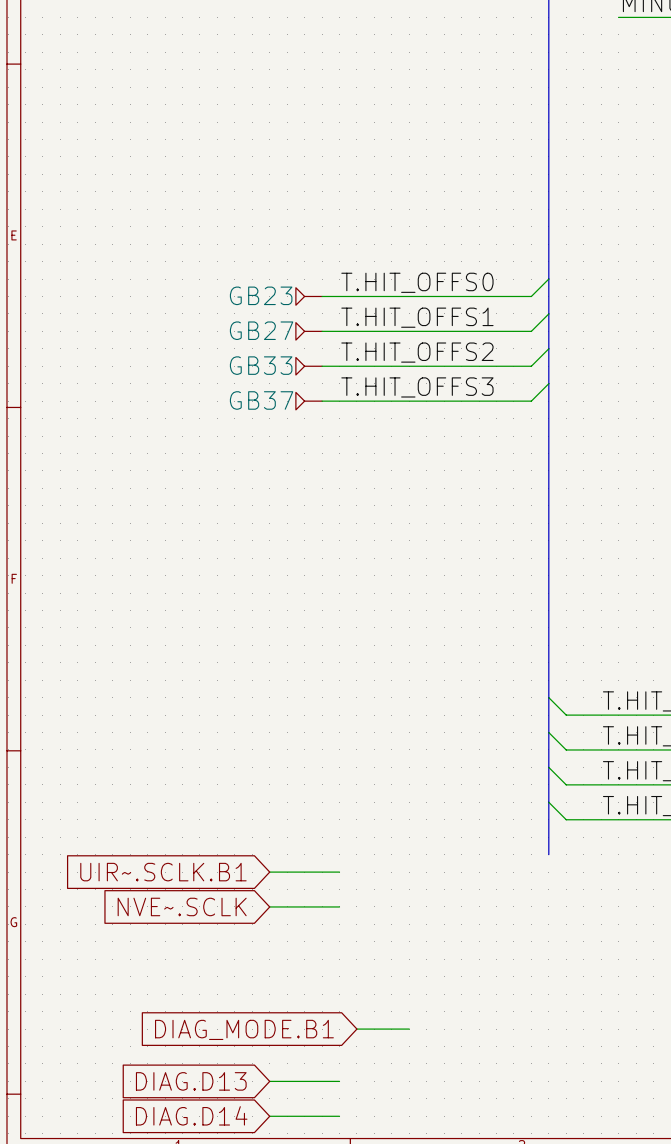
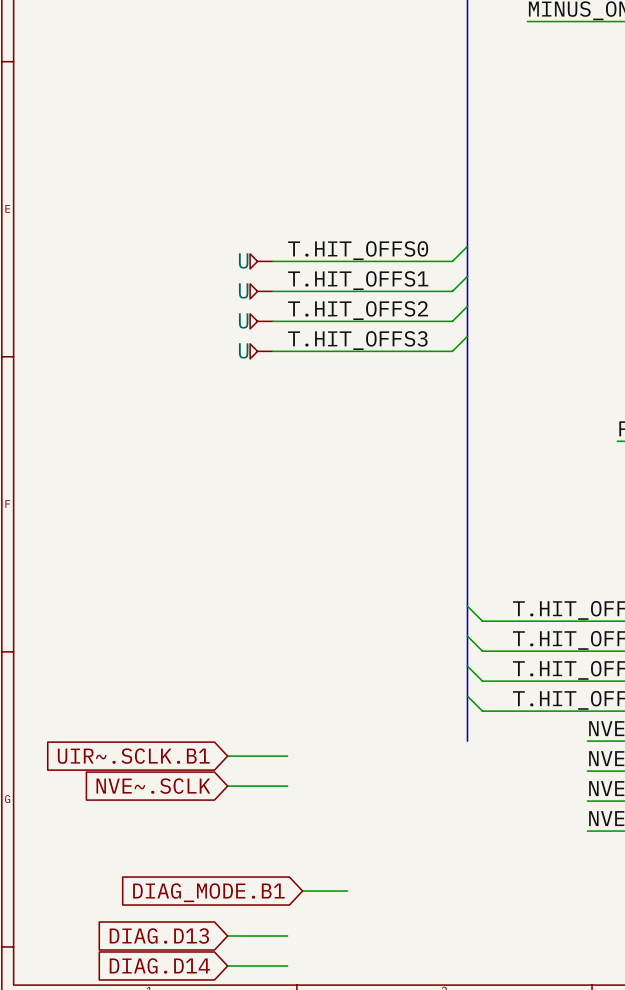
GB23 name: GB23 (261, 295) -> U (243, 260)
GB27 name: GB27 (261, 330) -> U (243, 290)
GB33 name: GB33 (261, 365) -> U (243, 320)
GB37 name: GB37 (261, 400) -> U (243, 350)

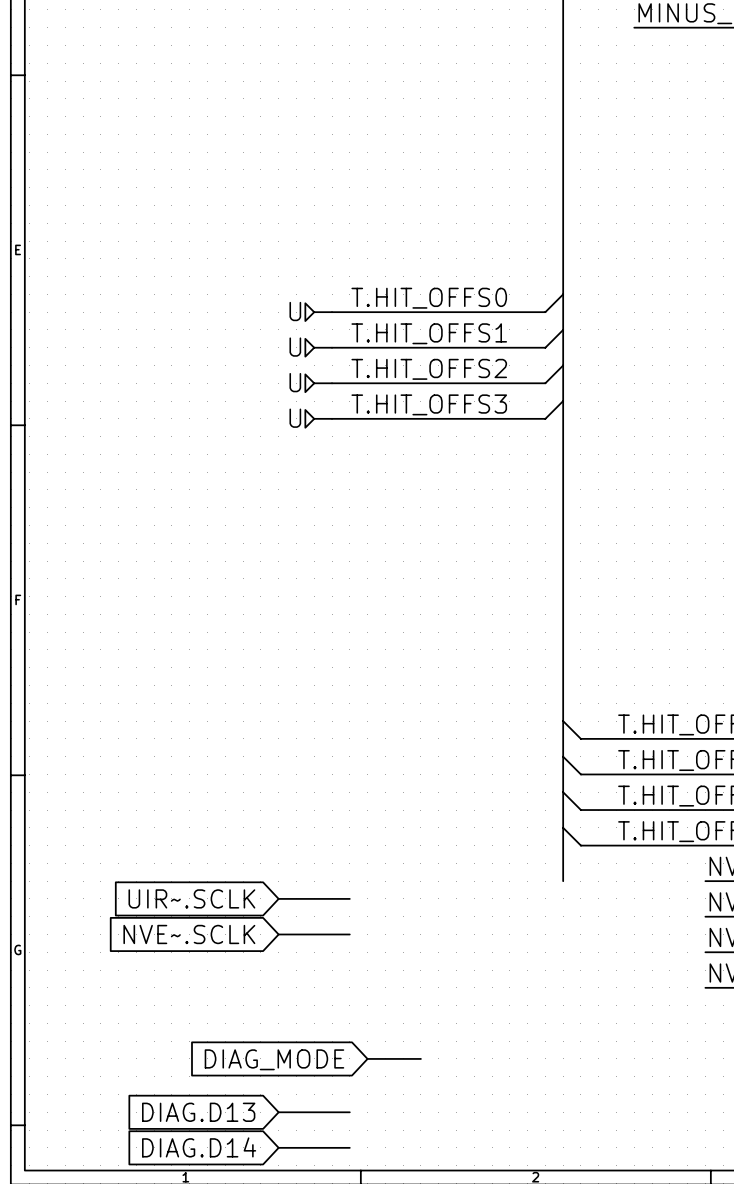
global label: UIR~.SCLK.B1 (133, 756) -> UIR~.SCLK (191, 898)
global label: DIAG_MODE.B1 (208, 892) -> DIAG_MODE (274, 1059)

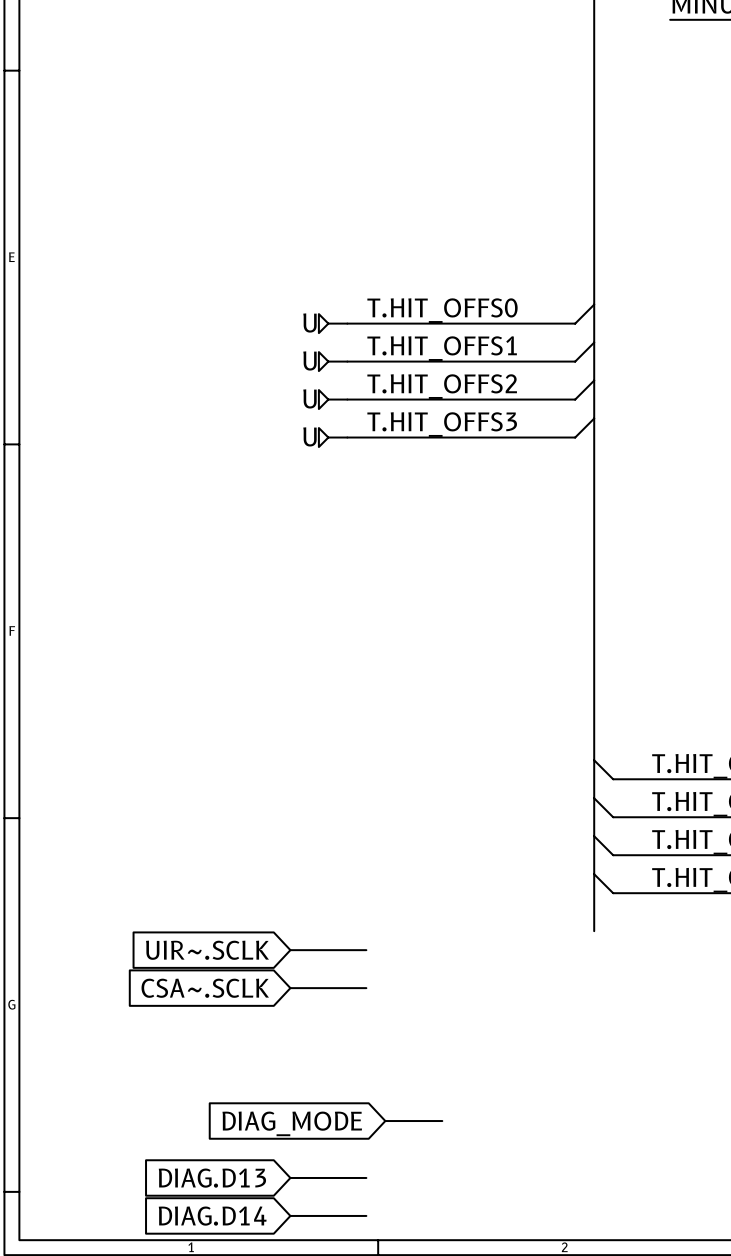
global label: NVE~.SCLK (189, 934) -> CSA~.SCLK (205, 988)

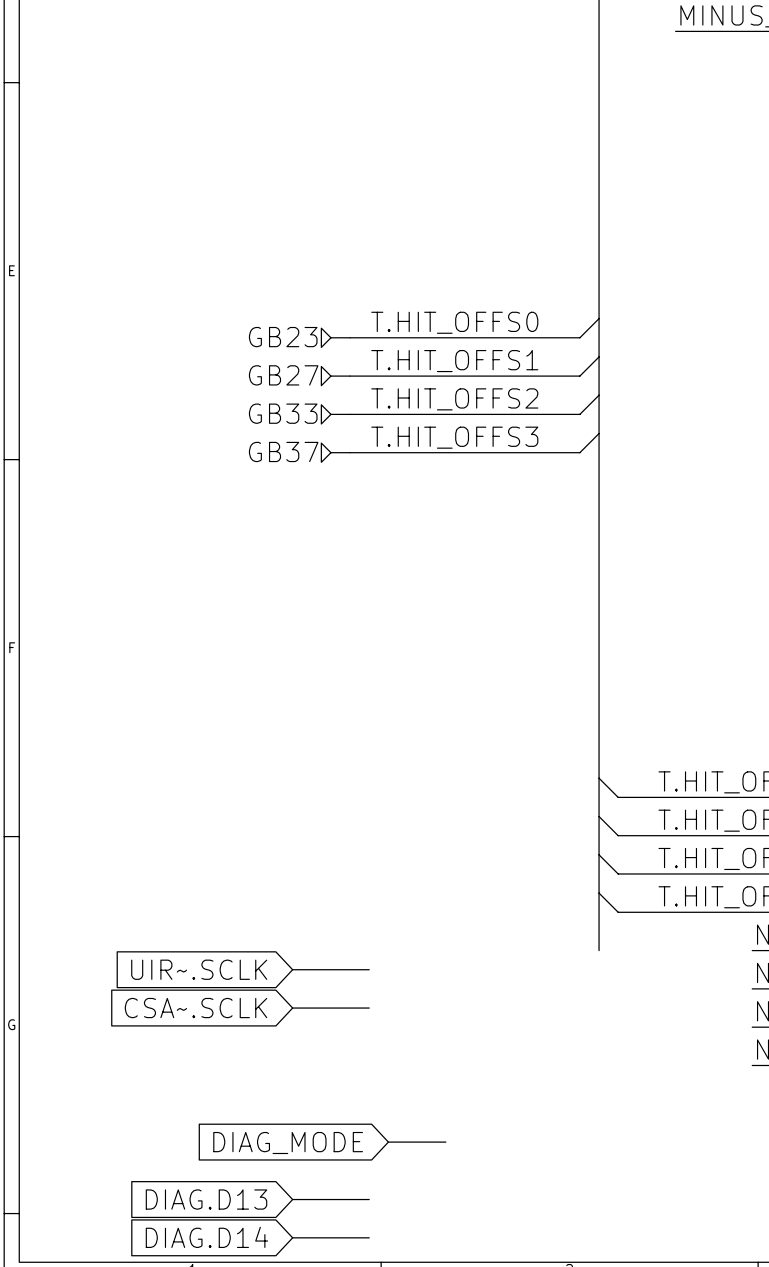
U name: U (309, 323) -> GB23 (283, 337)
U name: U (309, 360) -> GB27 (283, 375)
U name: U (309, 398) -> GB33 (283, 413)
U name: U (309, 436) -> GB37 (283, 451)

